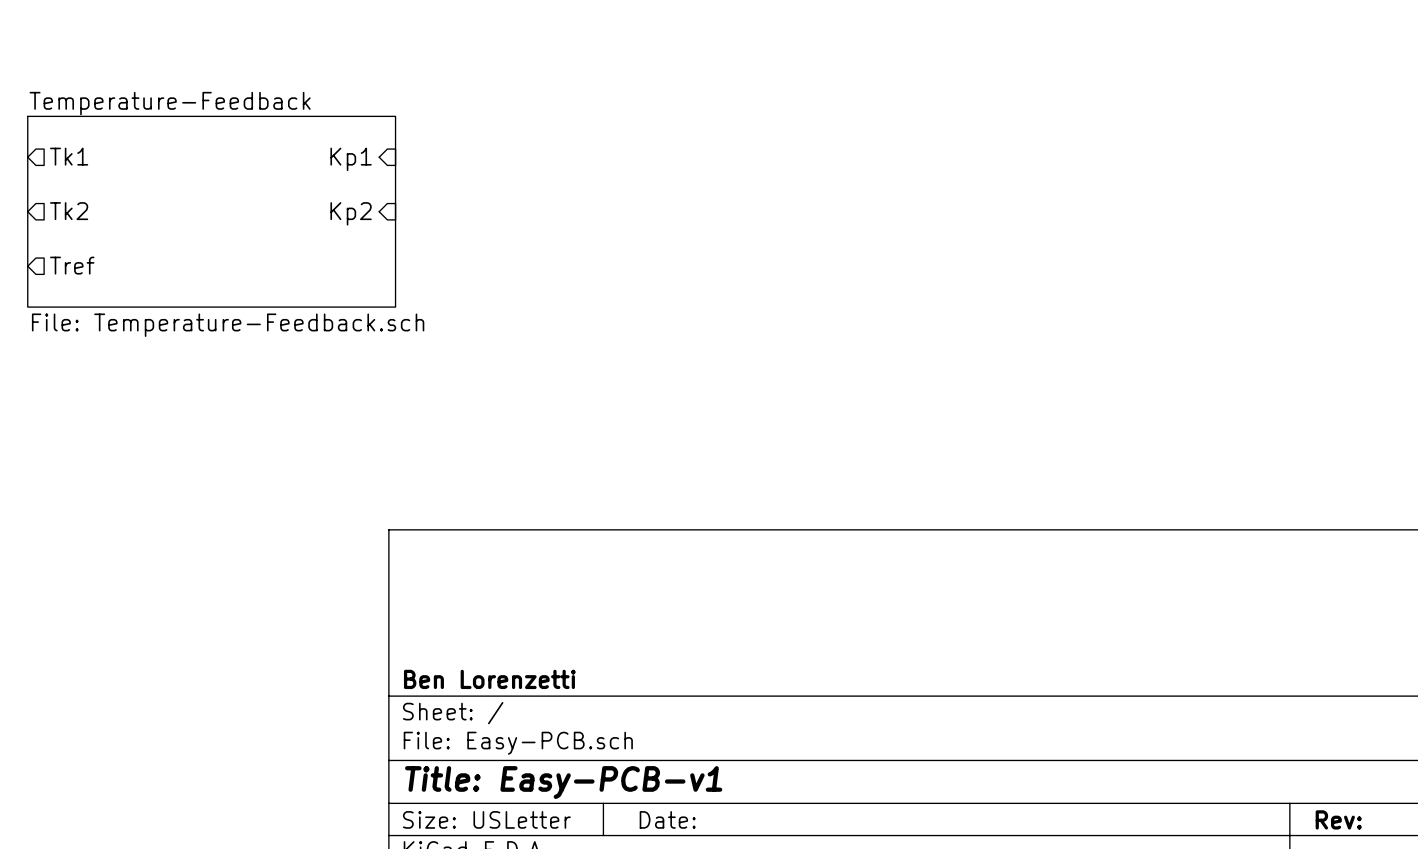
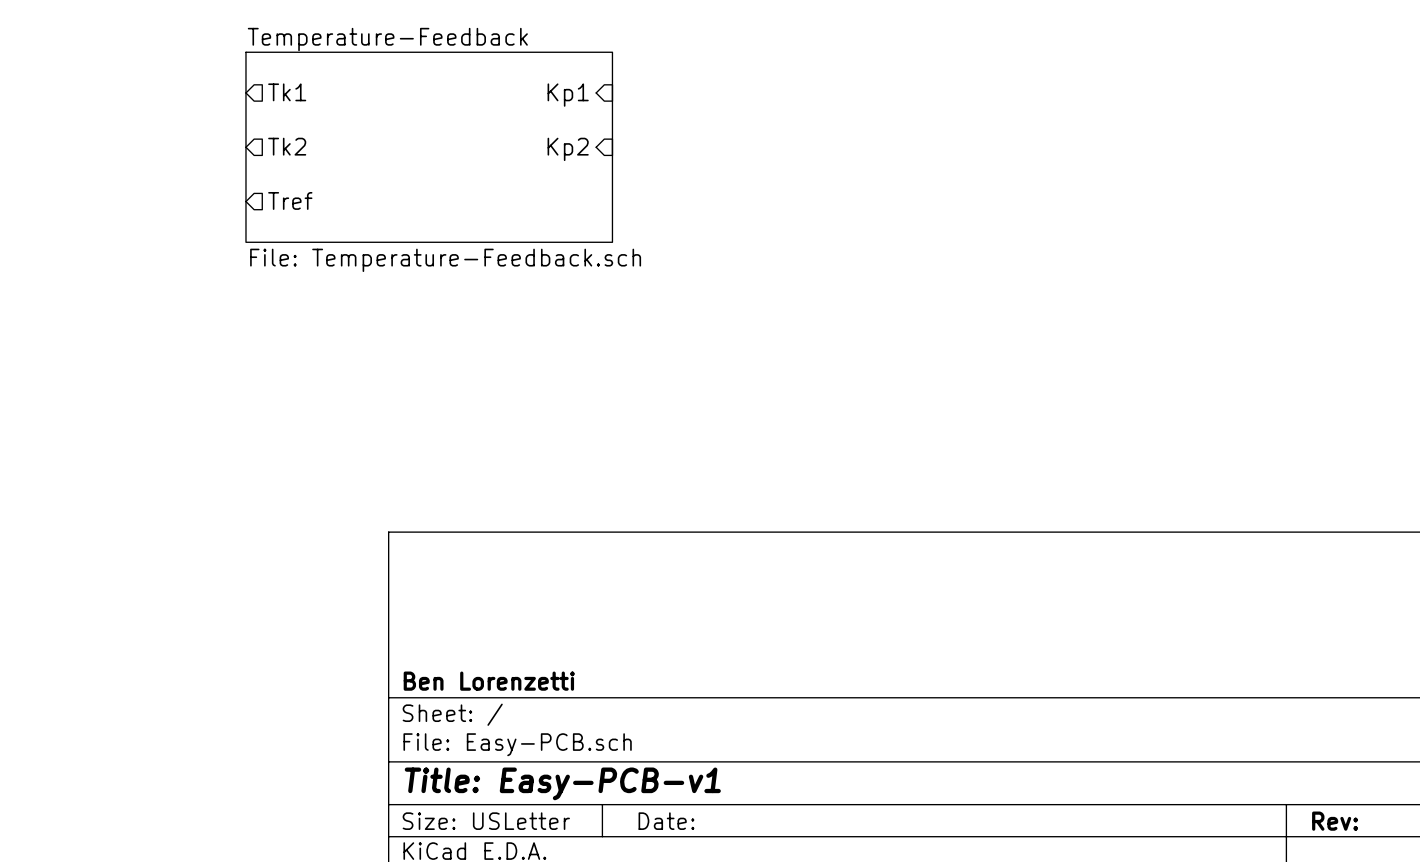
sheet pin position: Tk1 (69, 156) -> Tk1 (287, 92)
sheet pin position: Kp1 (351, 159) -> Kp1 (568, 95)
sheet pin position: Tk2 (69, 211) -> Tk2 (287, 146)
sheet Temperature-Feedback position: (211, 211) -> (429, 147)
sheet pin position: Kp2 (351, 213) -> Kp2 (568, 149)
sheet pin position: Tref (72, 265) -> Tref (290, 200)

